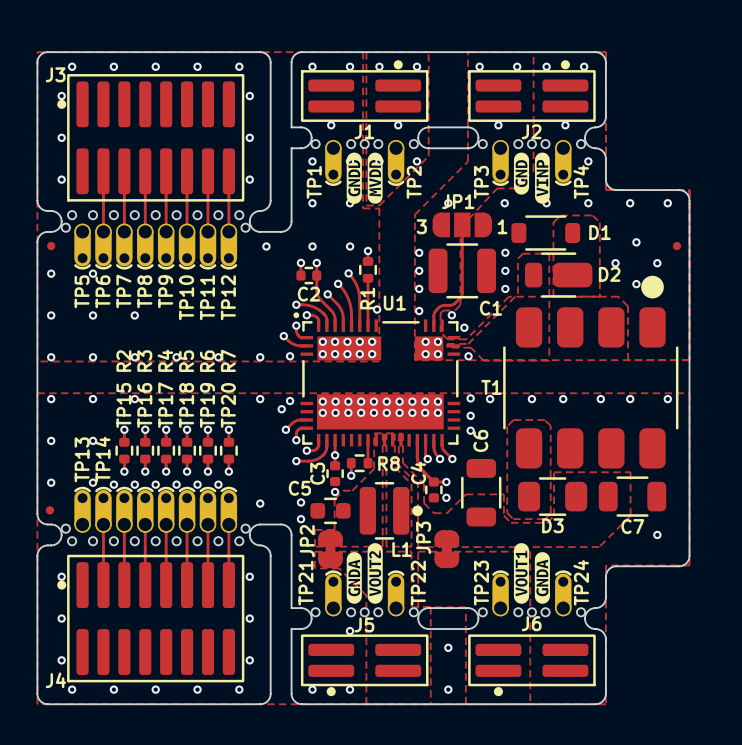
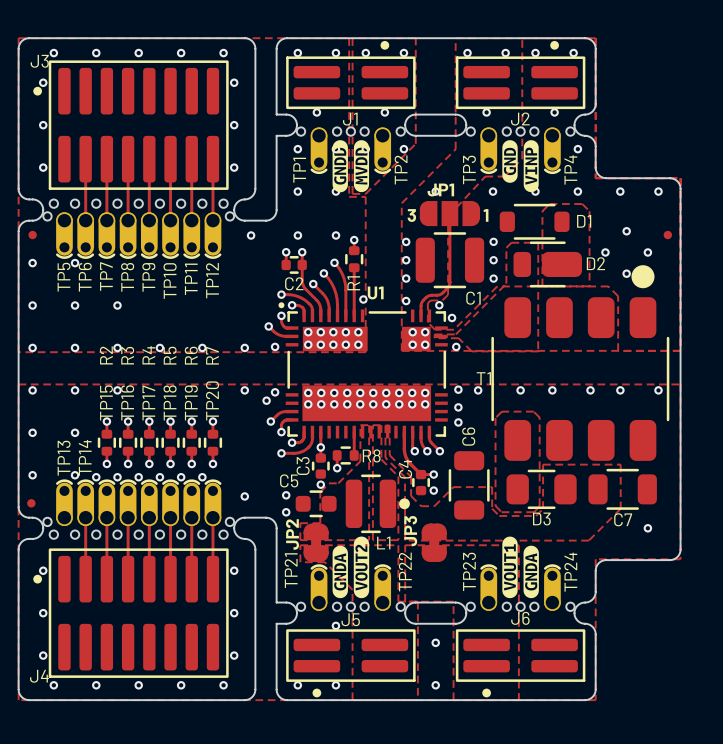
J1 footprint: [300, 60, 429, 122] -> [286, 40, 416, 110]
J2 footprint: [468, 60, 596, 122] -> [455, 40, 586, 110]
J3 footprint: [57, 74, 245, 202] -> [33, 60, 229, 190]
J4 footprint: [57, 554, 245, 683] -> [33, 548, 229, 678]
J5 footprint: [300, 634, 429, 697] -> [286, 629, 416, 698]
J6 footprint: [468, 634, 596, 697] -> [455, 629, 586, 698]

